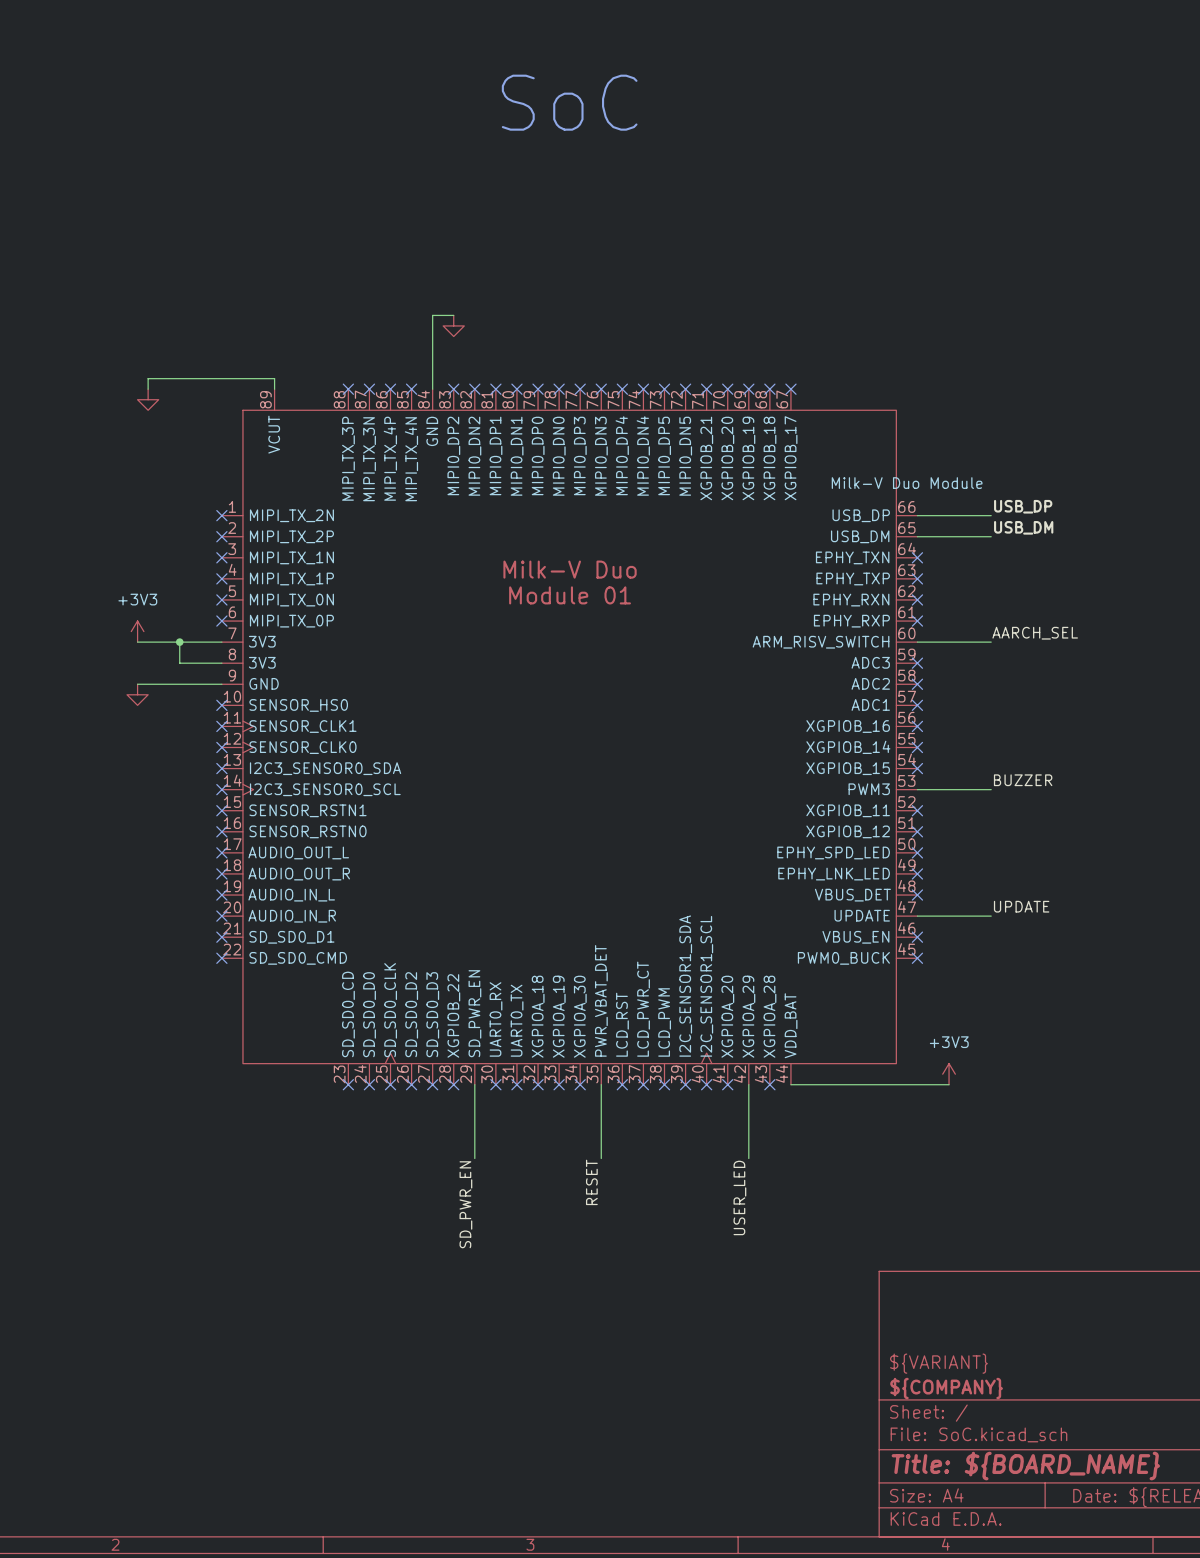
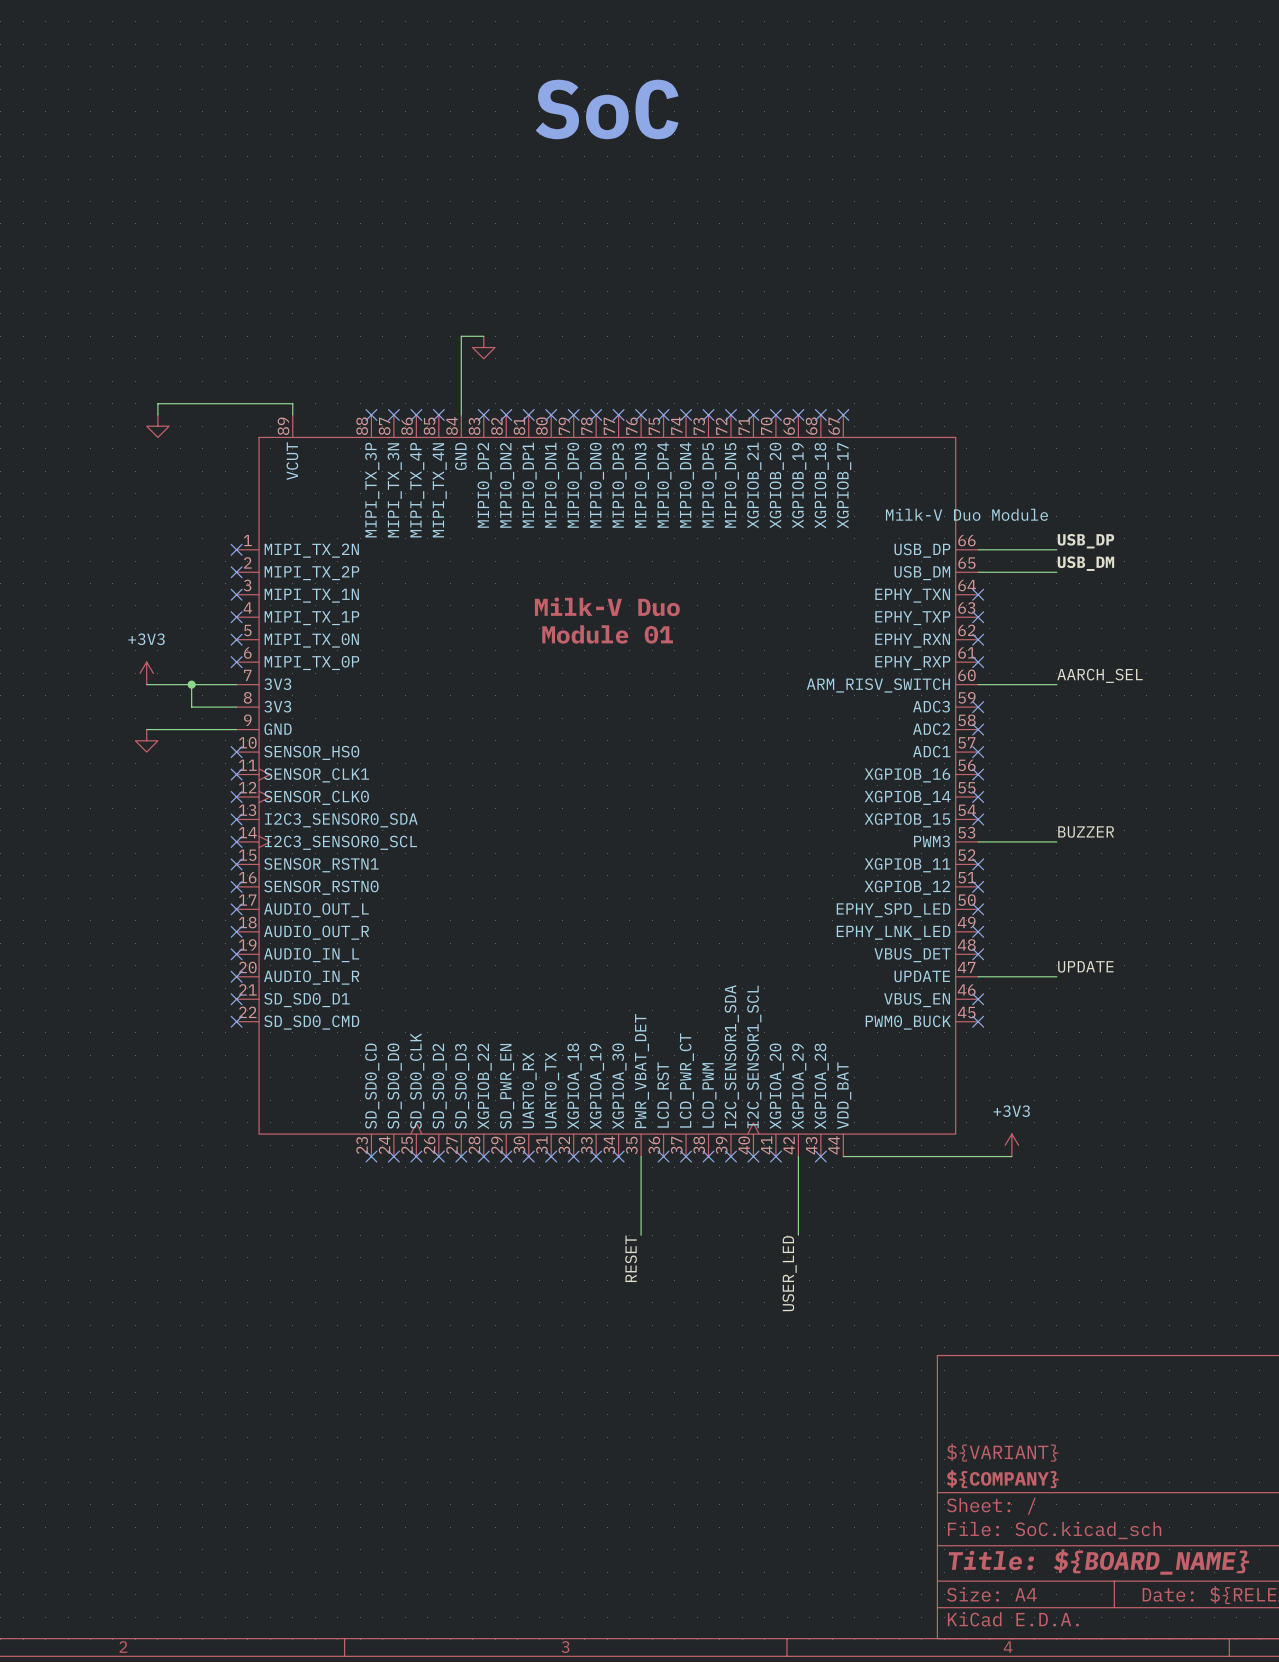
wire: (474, 1084) (474, 1158) -> none
no-connect mark: none -> (506, 1156)
label: SD_PWR_EN (465, 1204) -> none

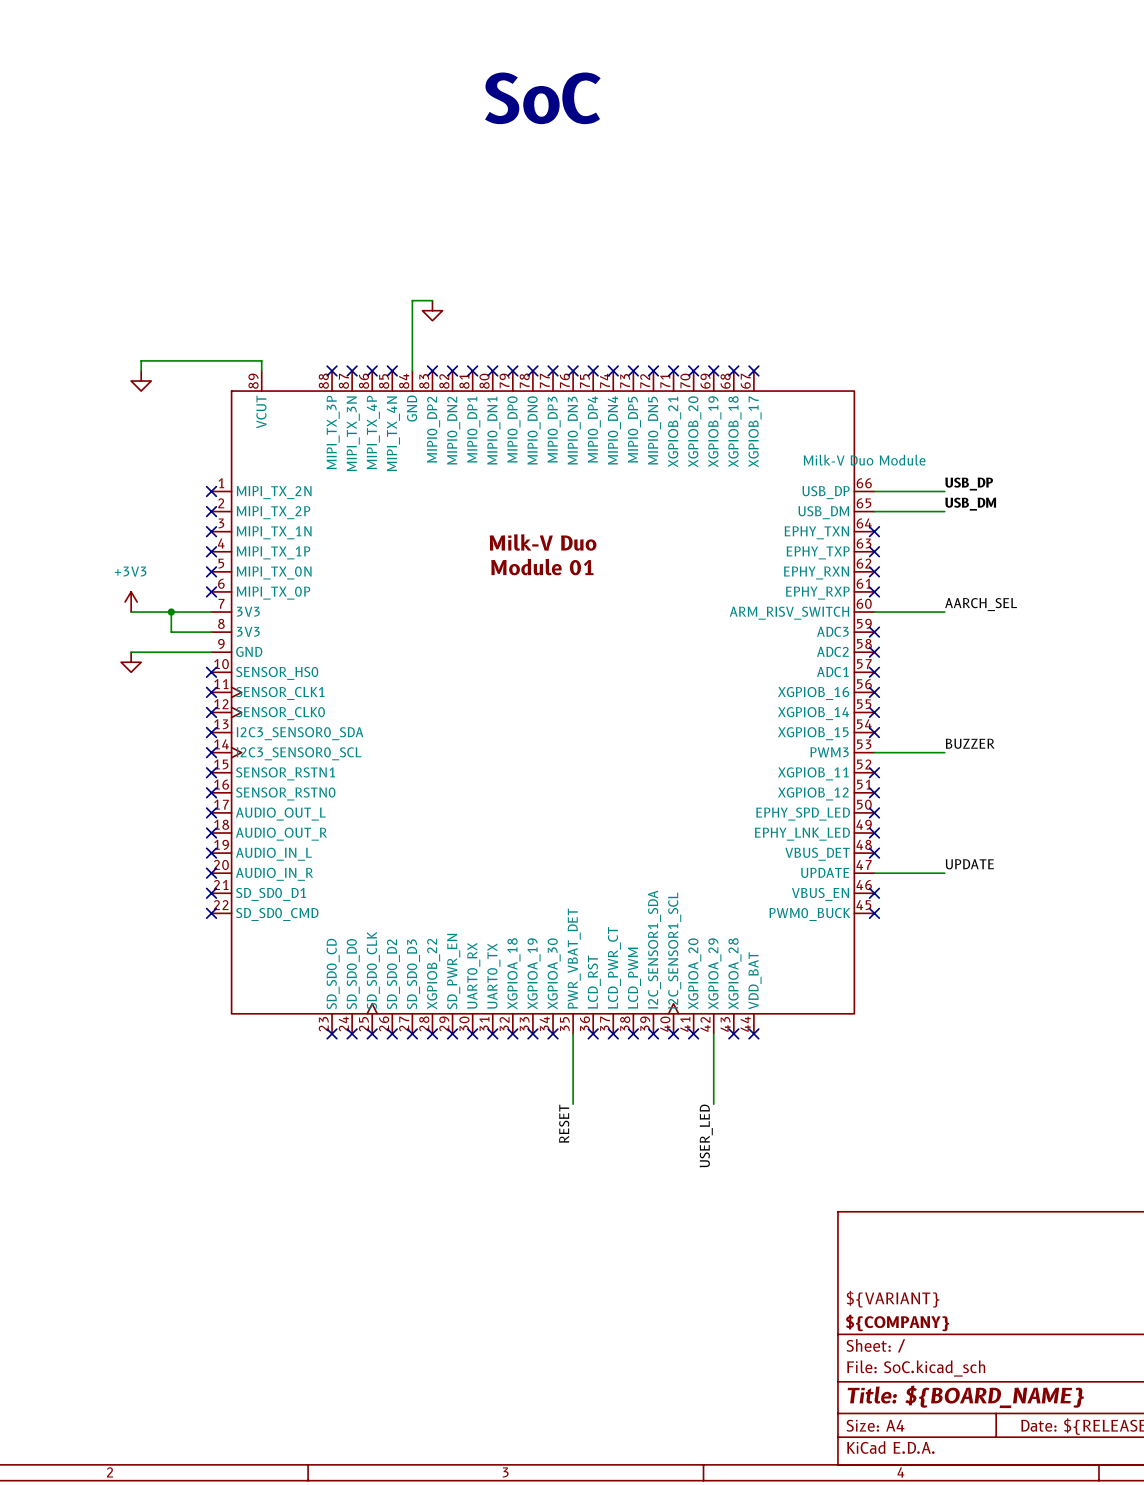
power symbol: +3V3 (1011, 1145) -> none
wire: (843, 1156) (1011, 1156) -> none
no-connect mark: none -> (753, 1033)

